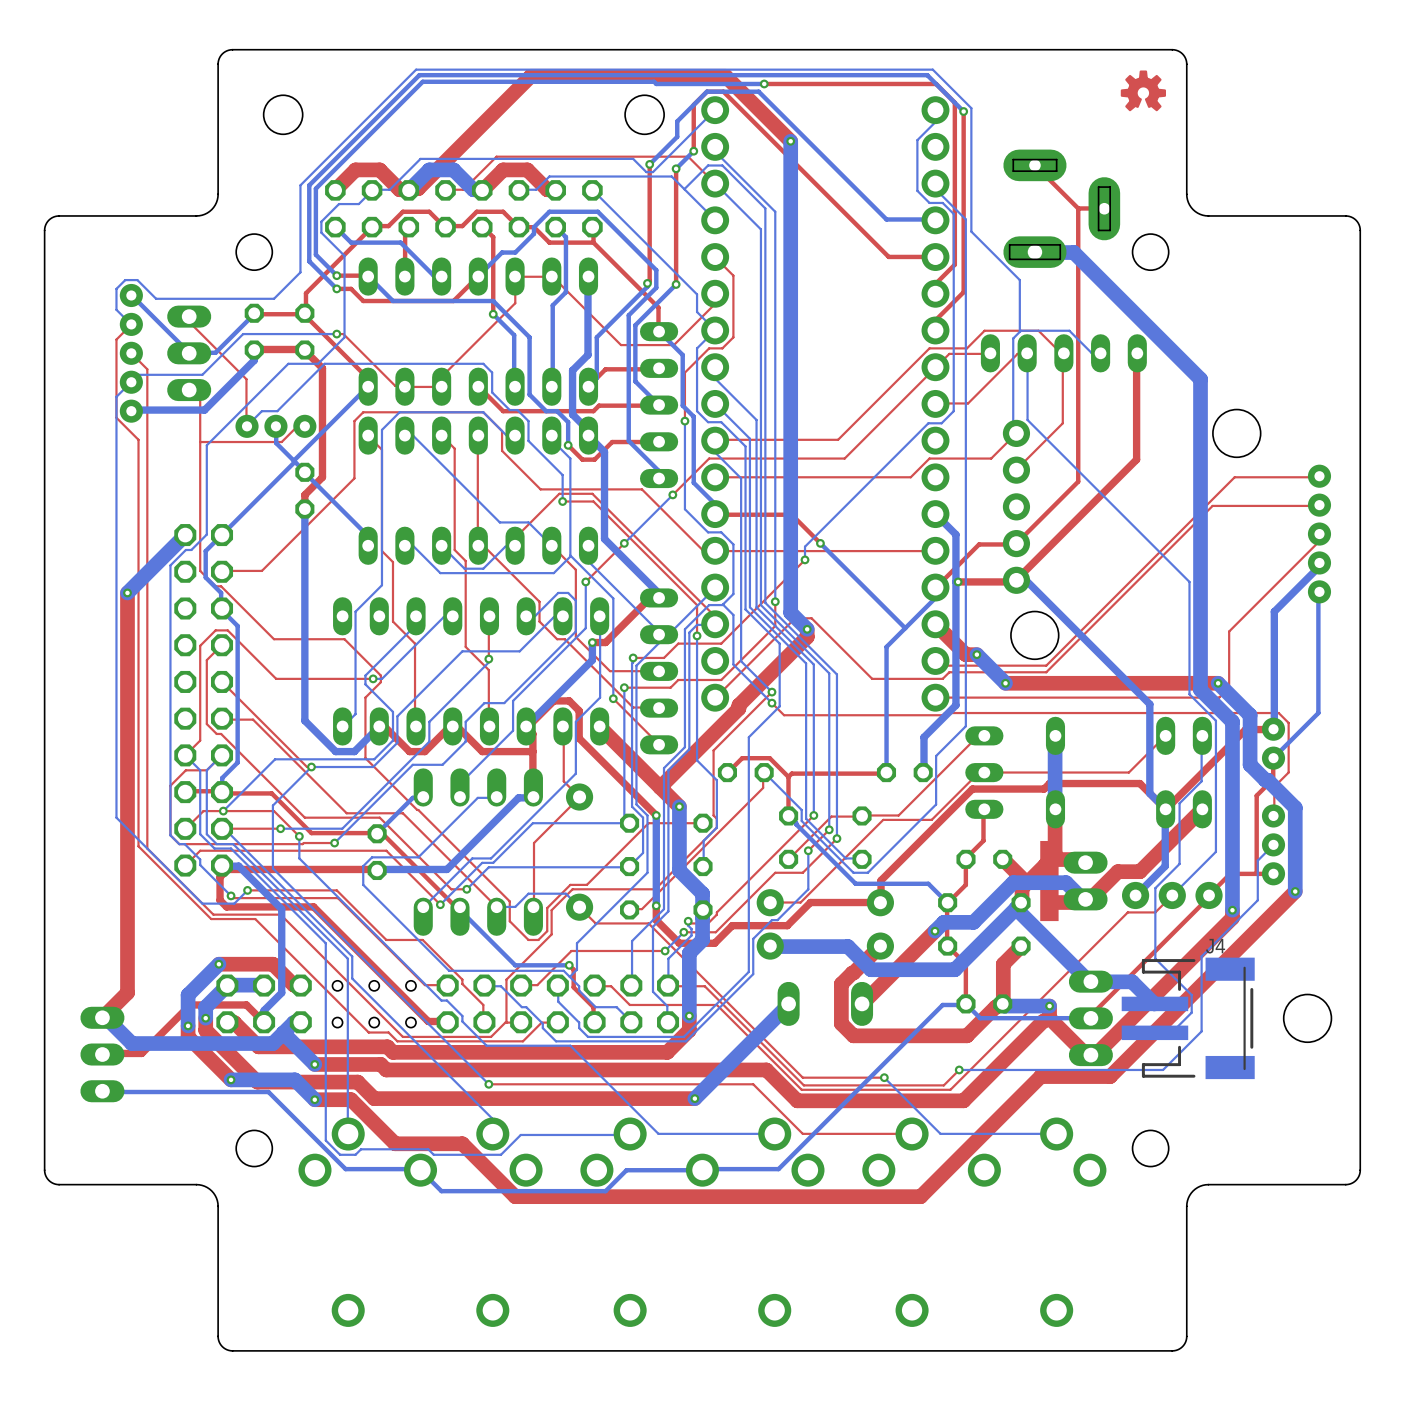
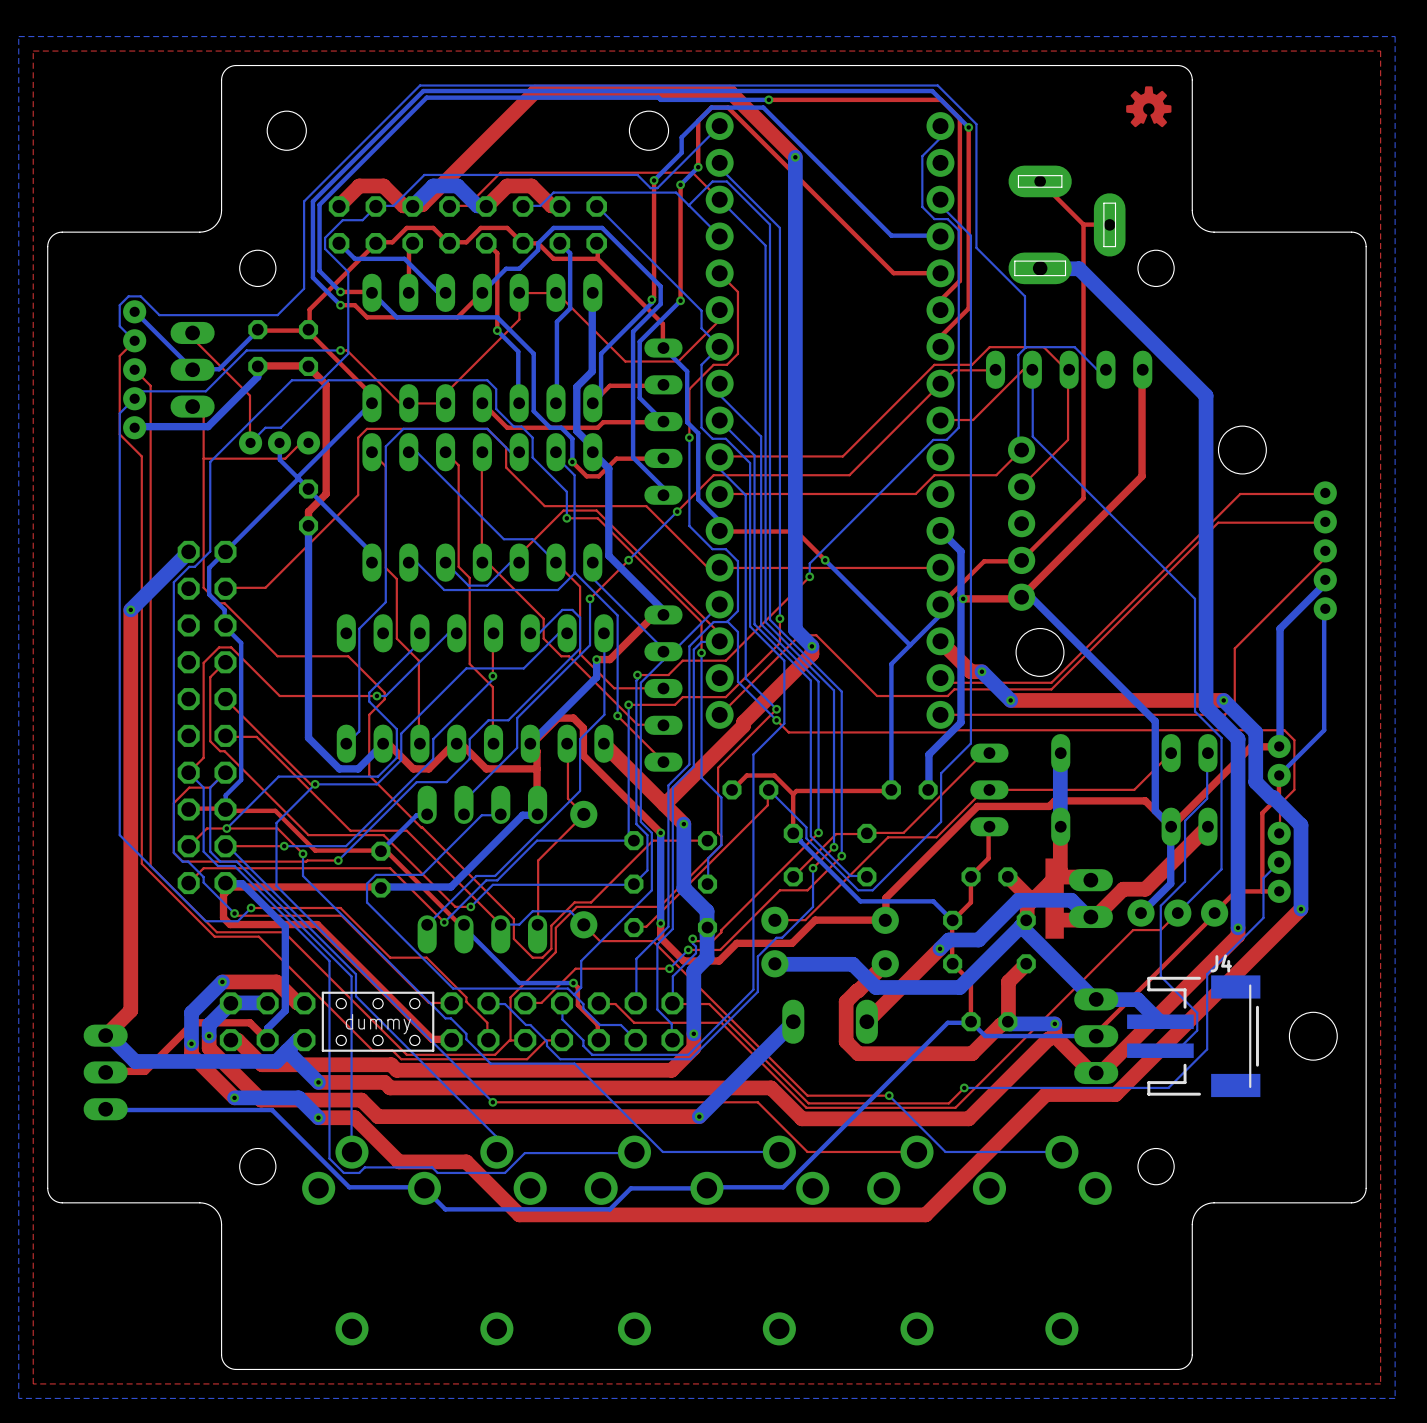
bottom zone outline: none -> (1395, 36) (18, 36) (18, 1398) (1395, 1398) (1395, 36)
top zone outline: none -> (1380, 51) (33, 51) (33, 1383) (1380, 1383) (1380, 51)
line: none -> (433, 992) (322, 992) (322, 1050) (433, 1050) (433, 992)
text: none -> dummy (378, 1024)

